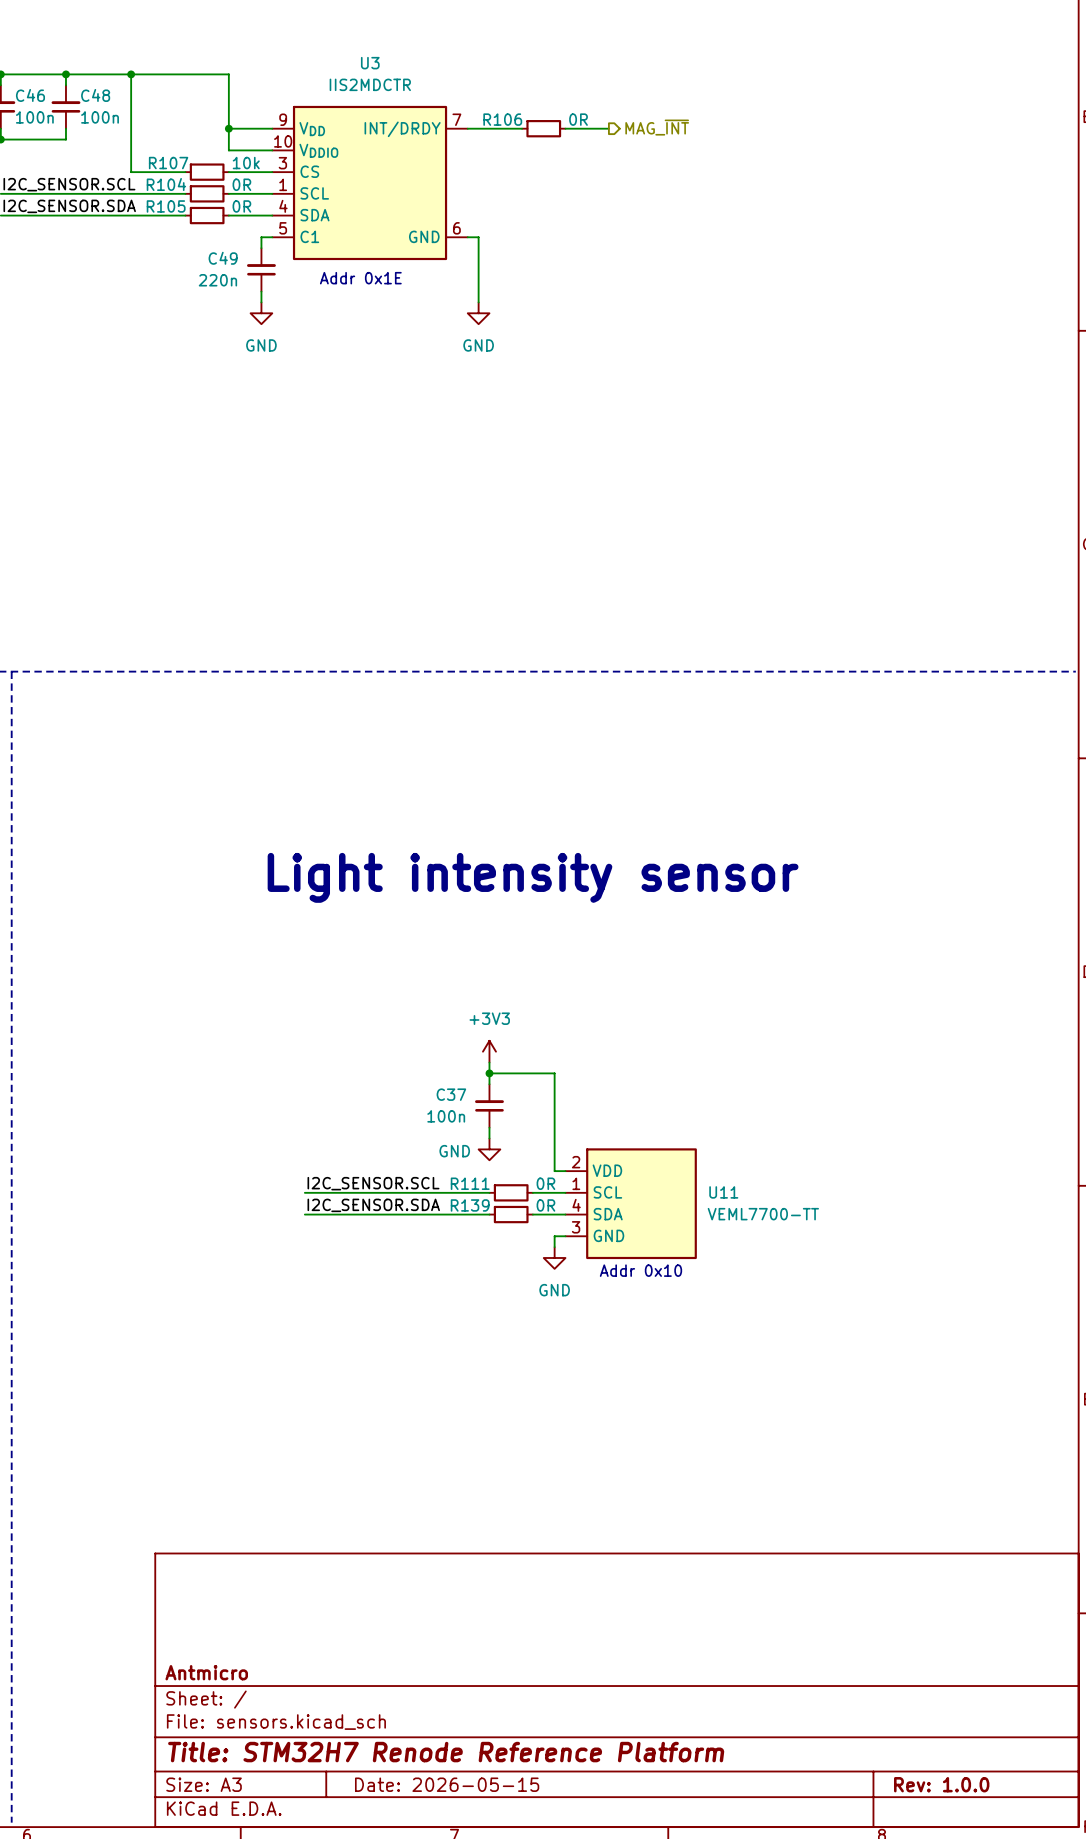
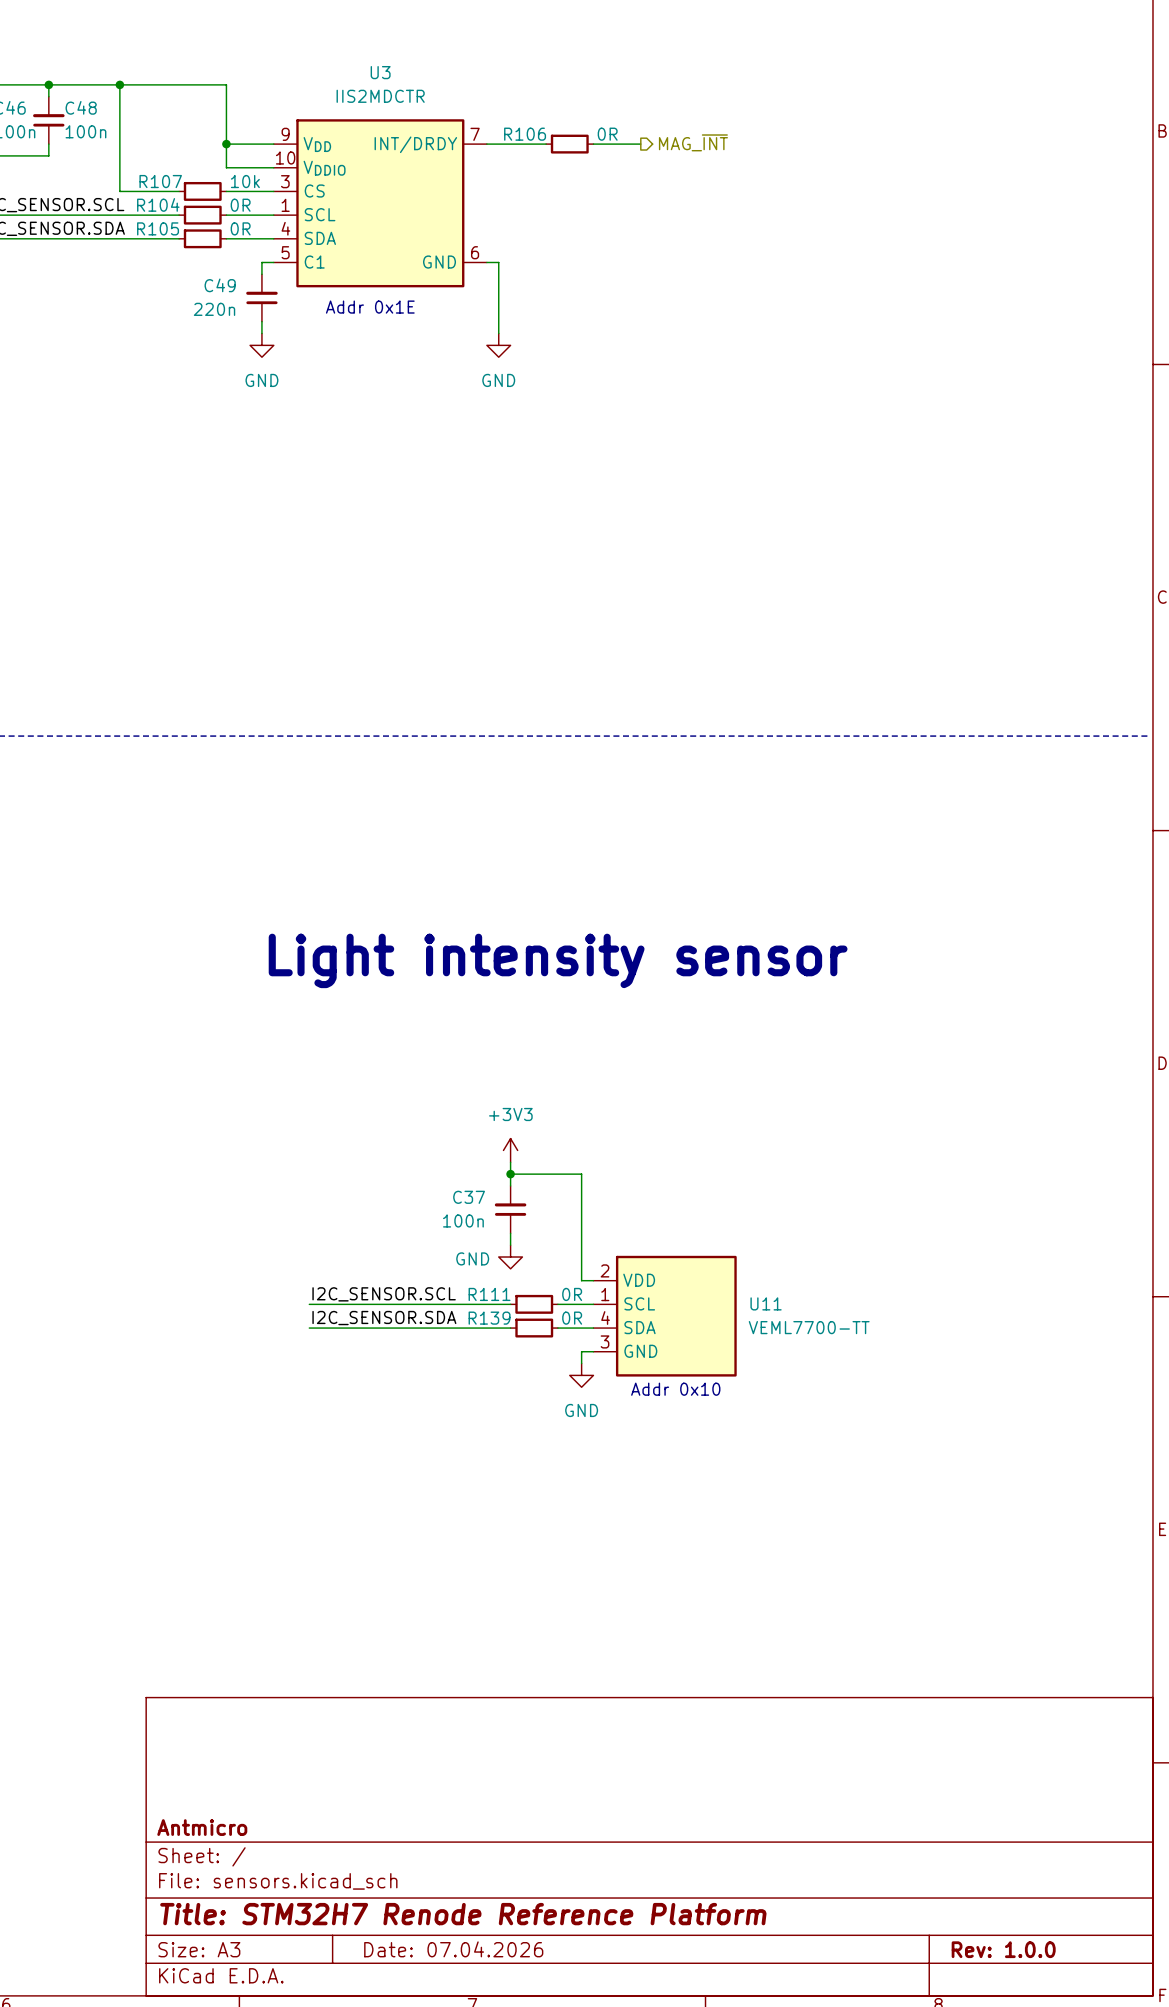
title block: Date: 2026-05-15 (447, 1784) -> Date: 07.04.2026 (453, 1949)

